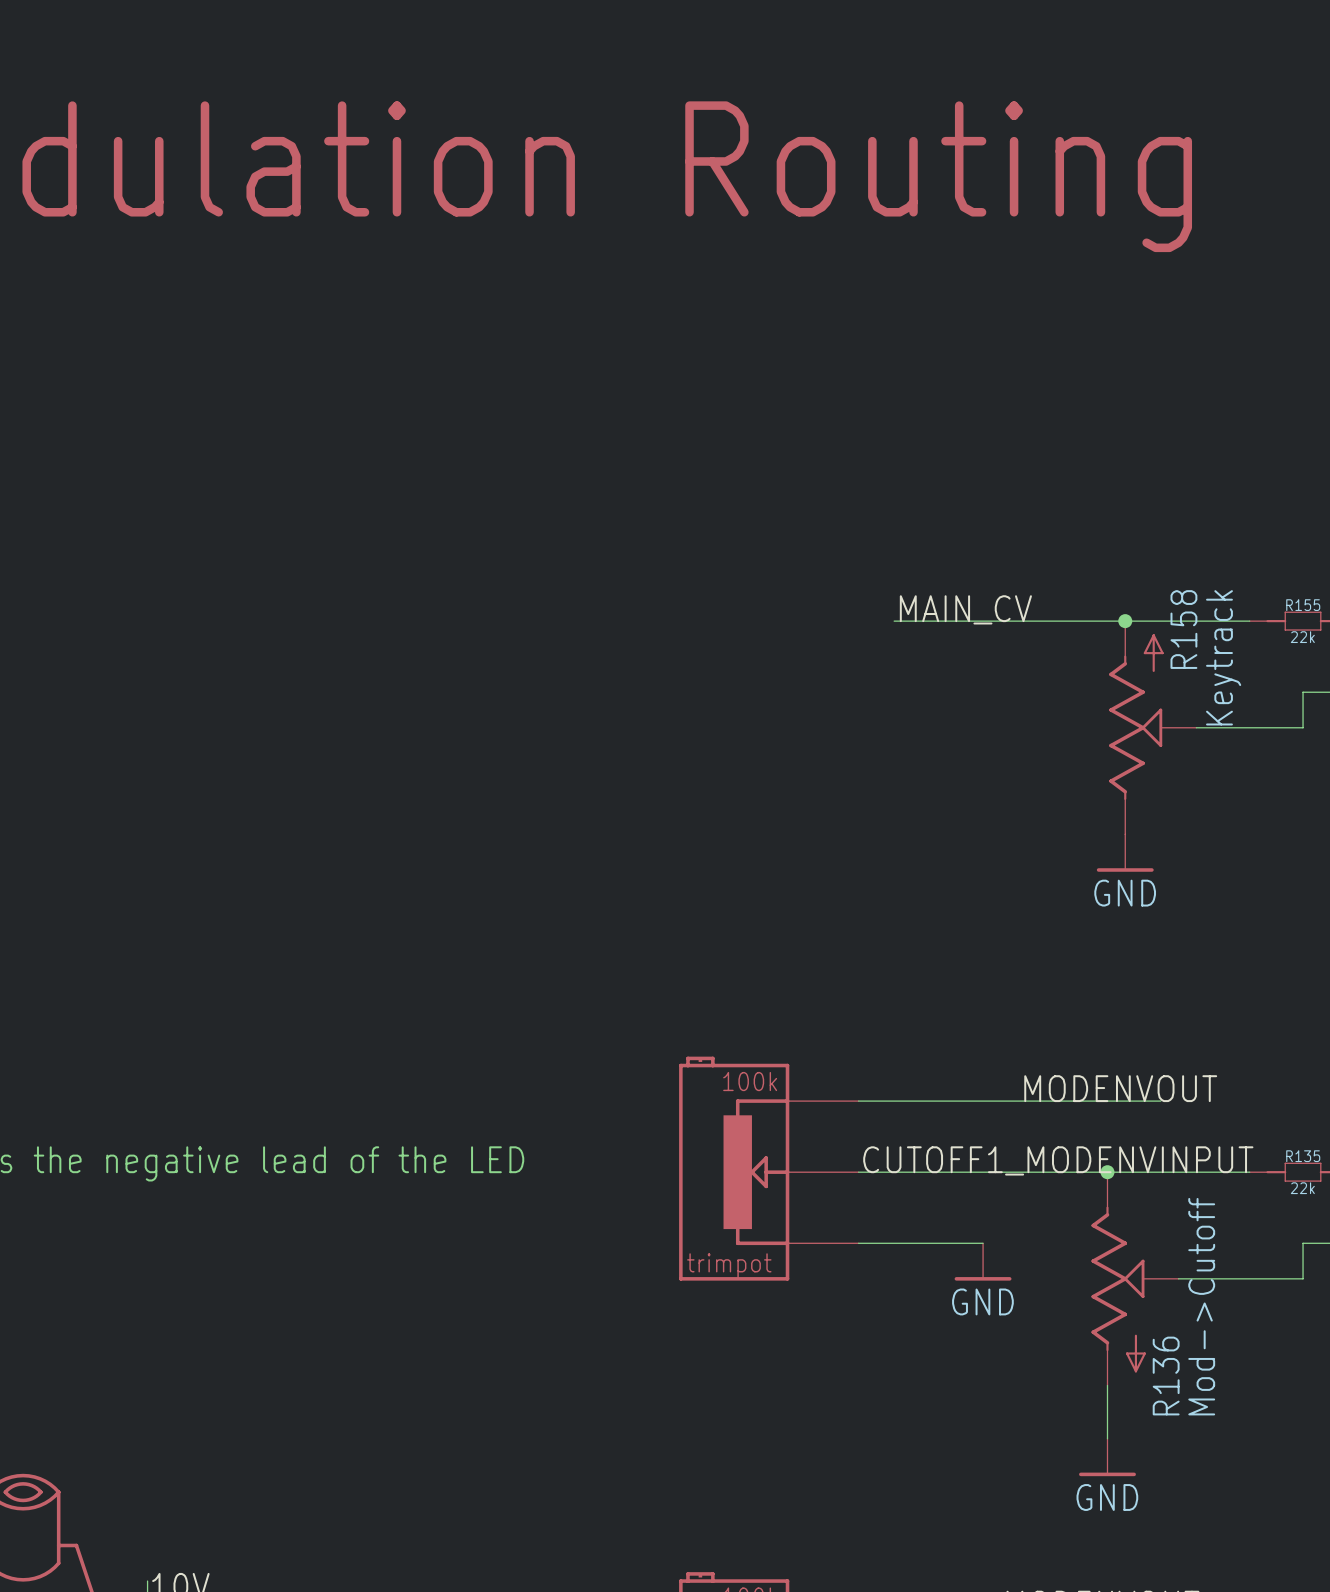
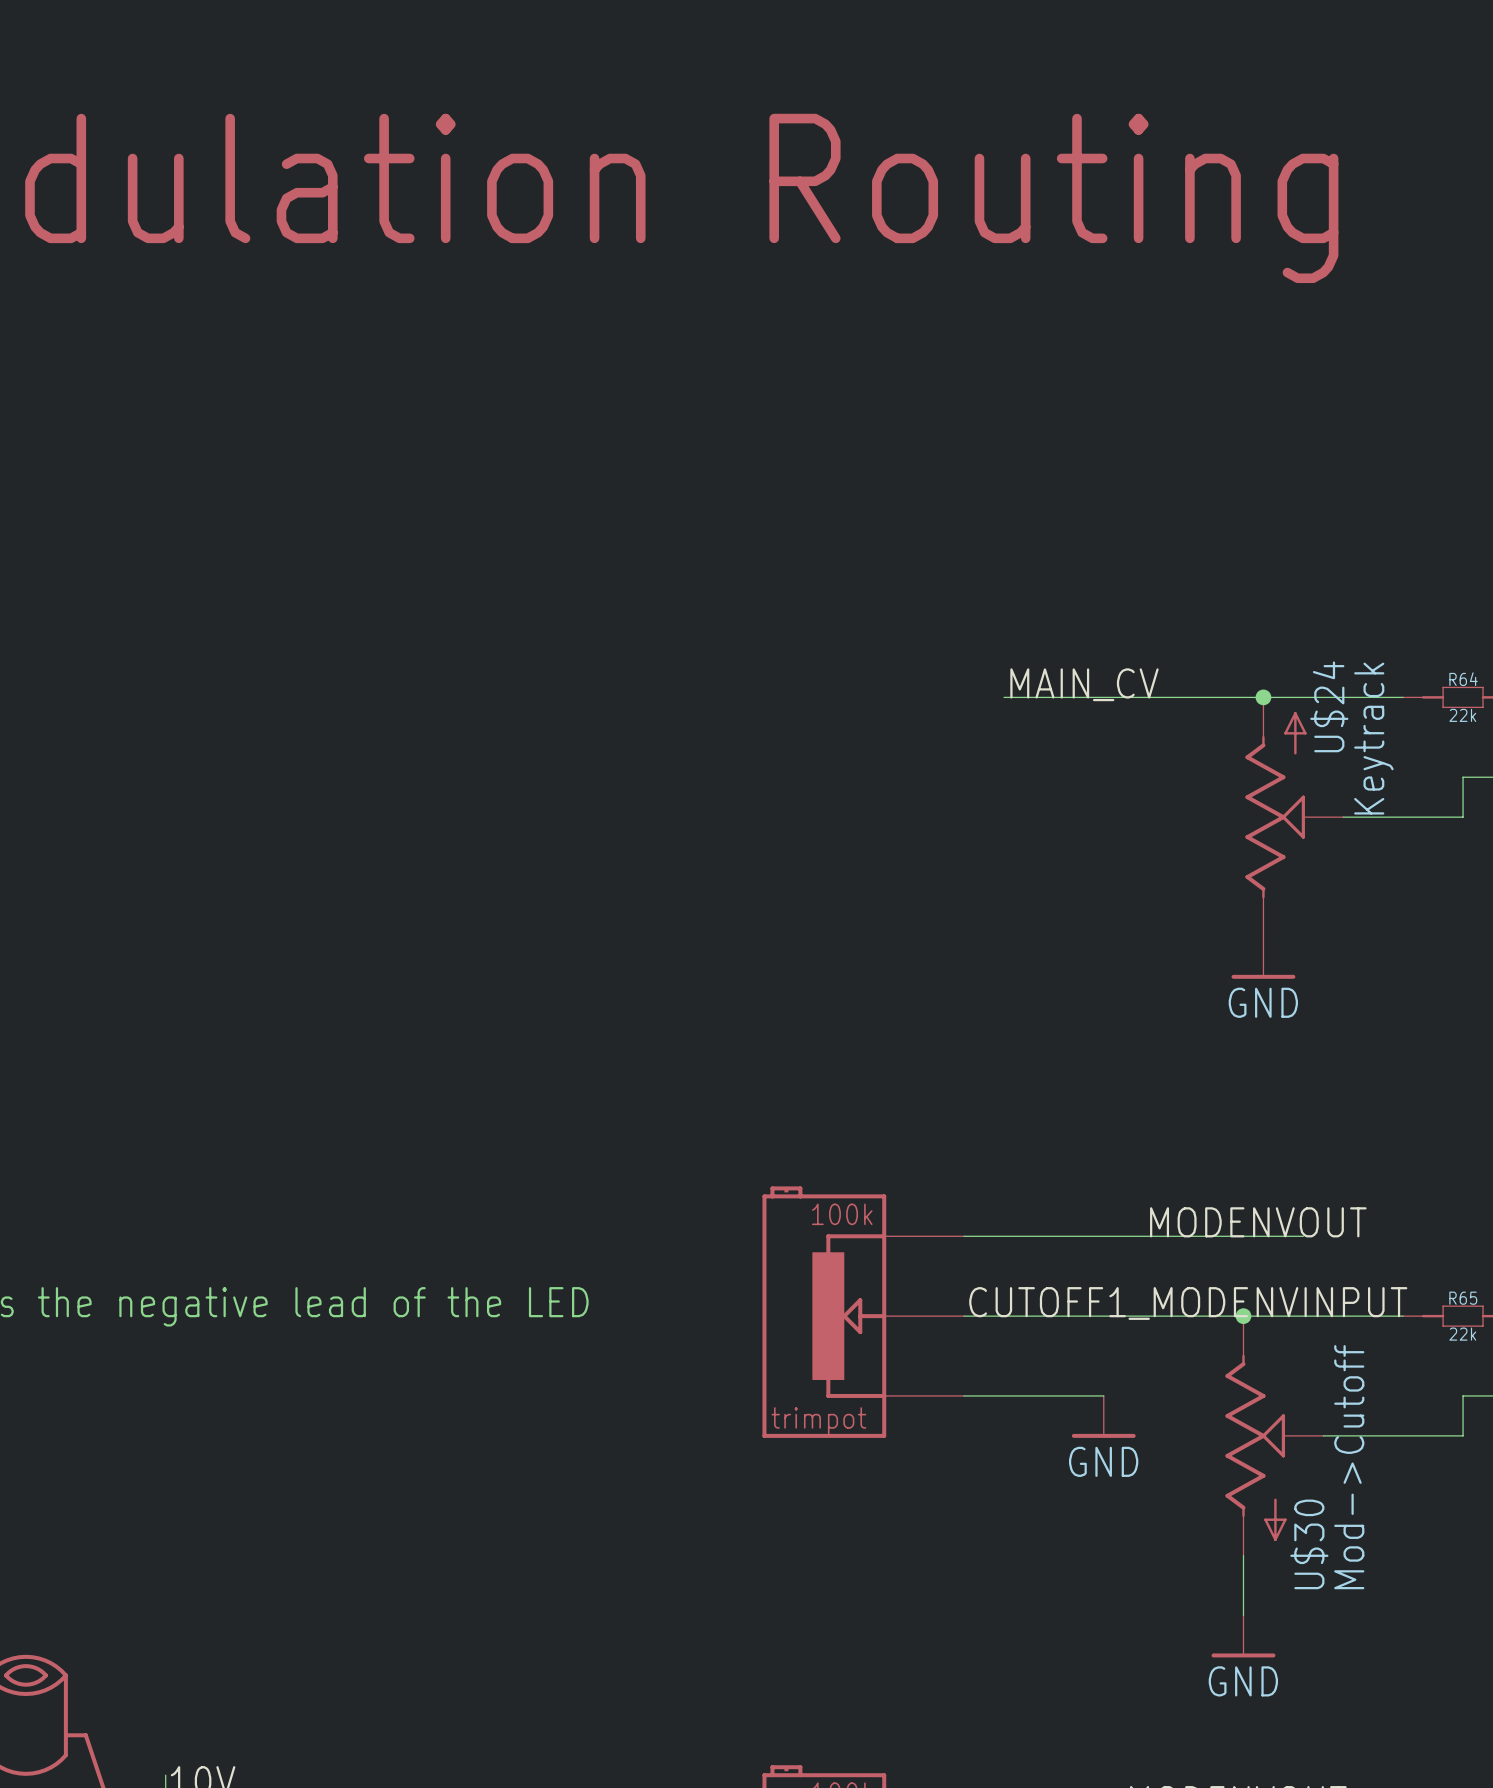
R155 name: R155 (1303, 605) -> R64 (1463, 679)
R158 name: R158 (1183, 629) -> U$24 (1329, 706)
R135 name: R135 (1303, 1156) -> R65 (1463, 1298)
R136 name: R136 (1166, 1376) -> U$30 (1309, 1544)

